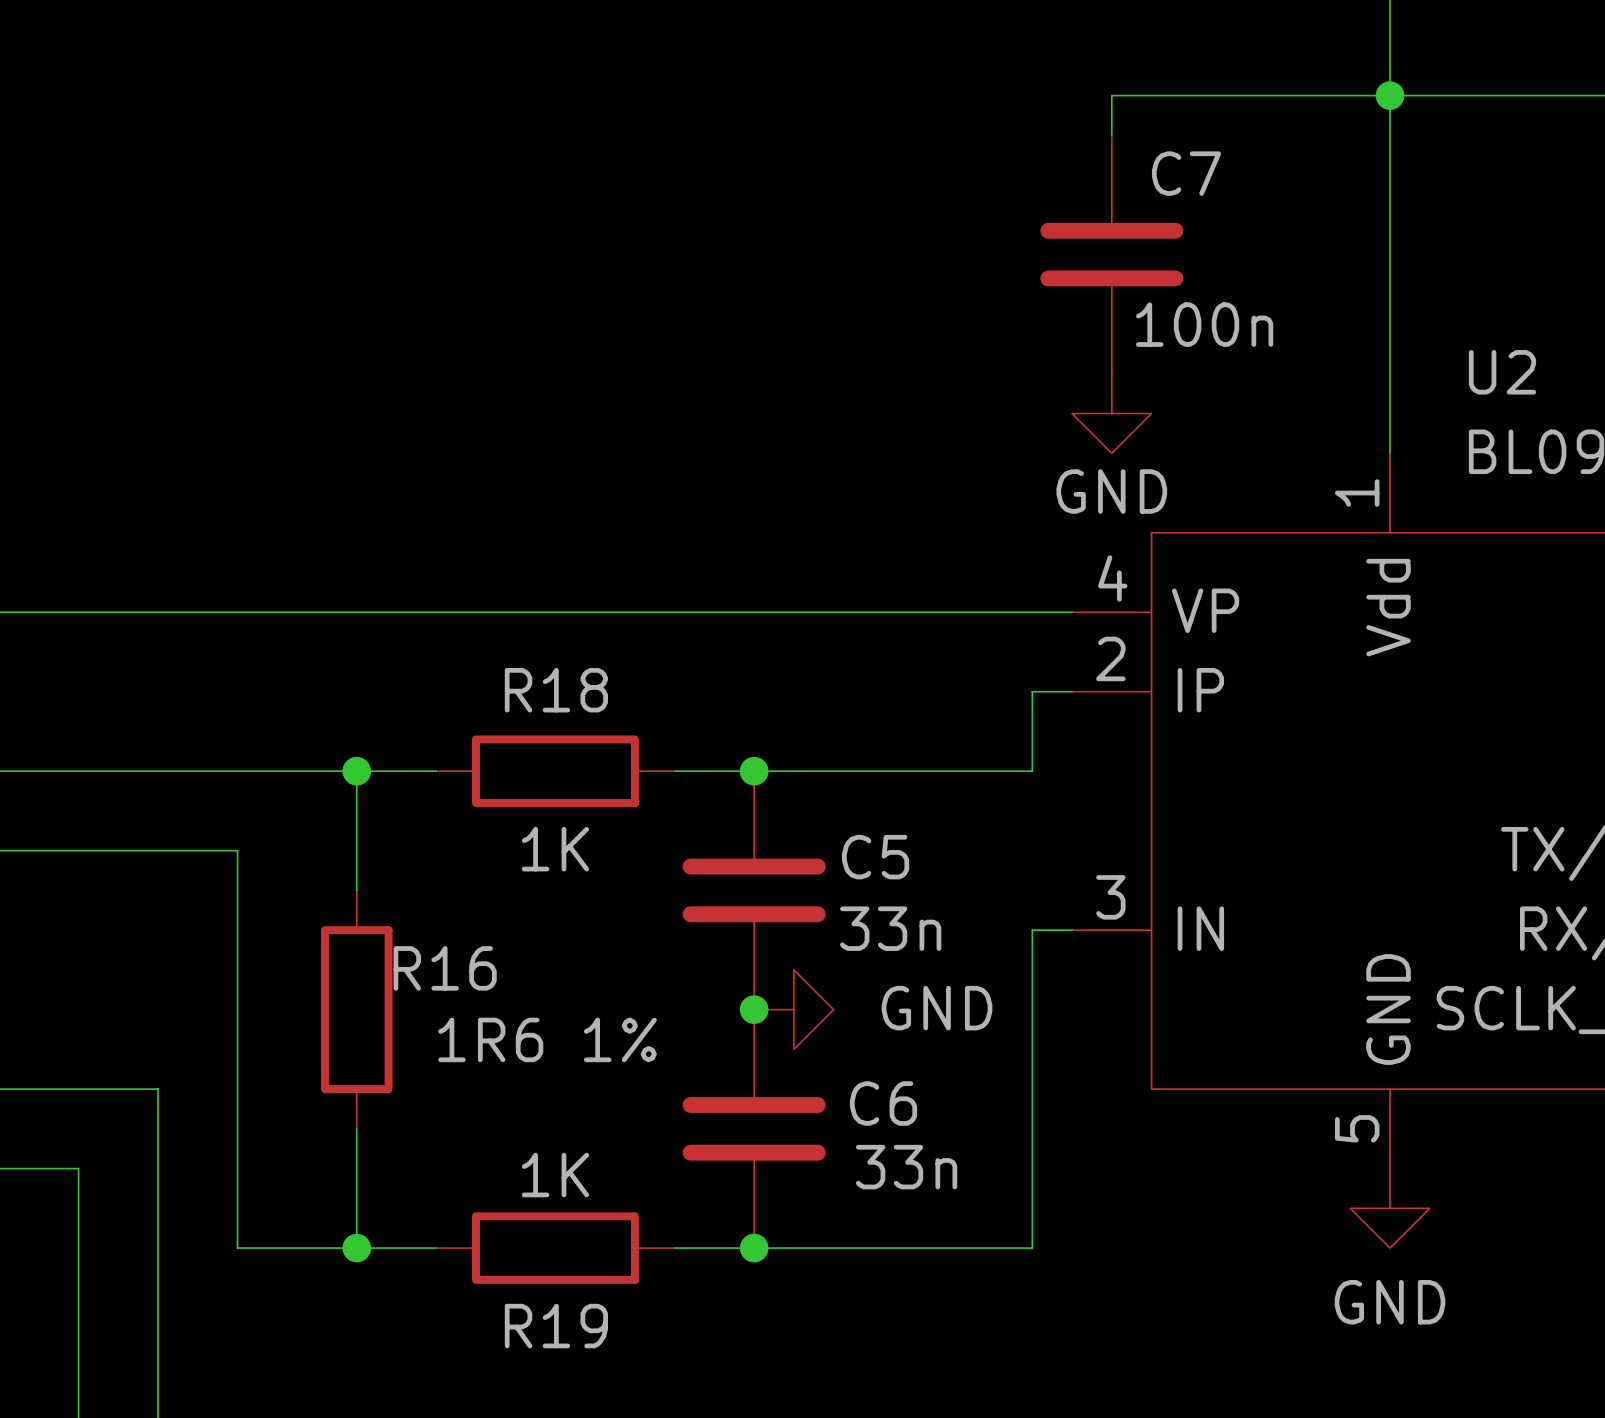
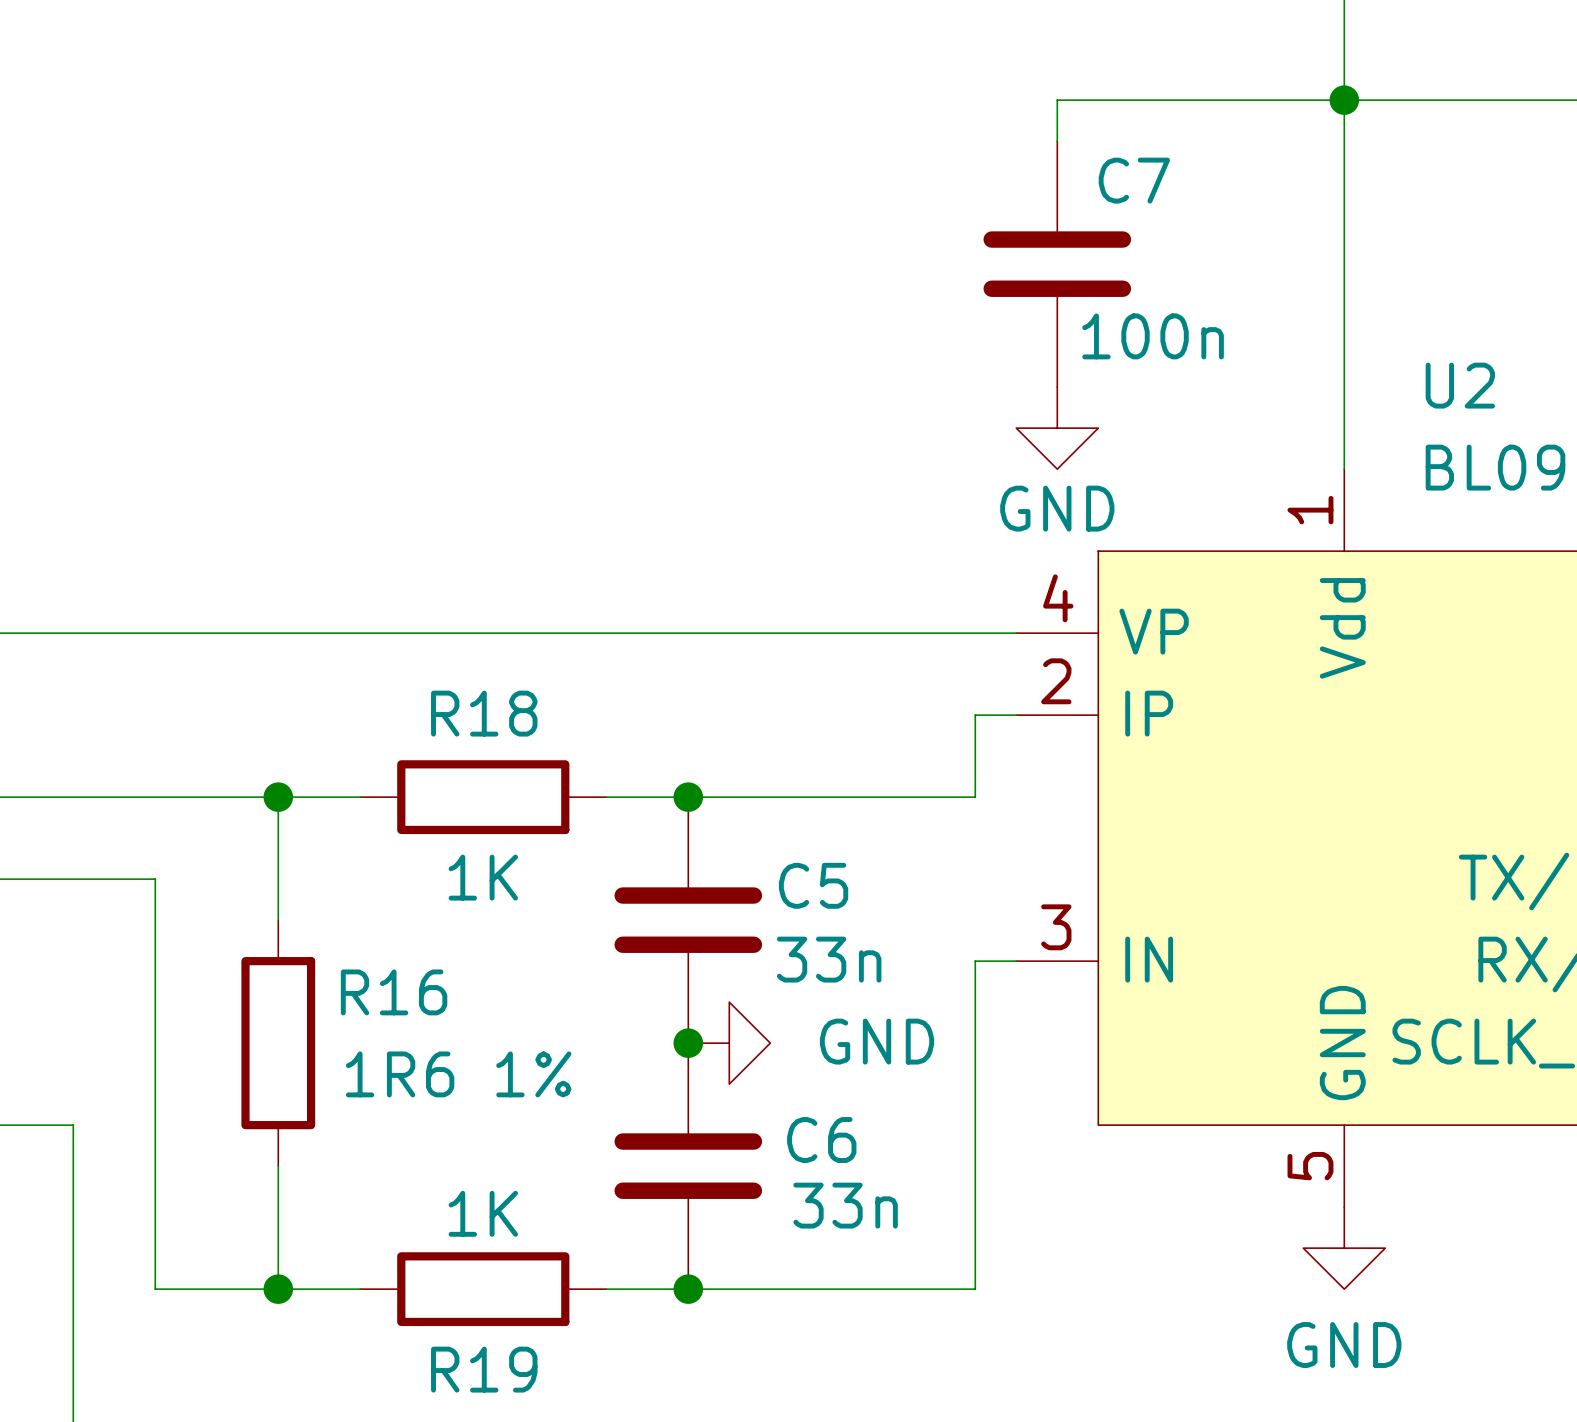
R16 name position: R16 (445, 968) -> R16 (394, 992)
R16 value position: 1R6 1% (547, 1039) -> 1R6 1% (458, 1074)

